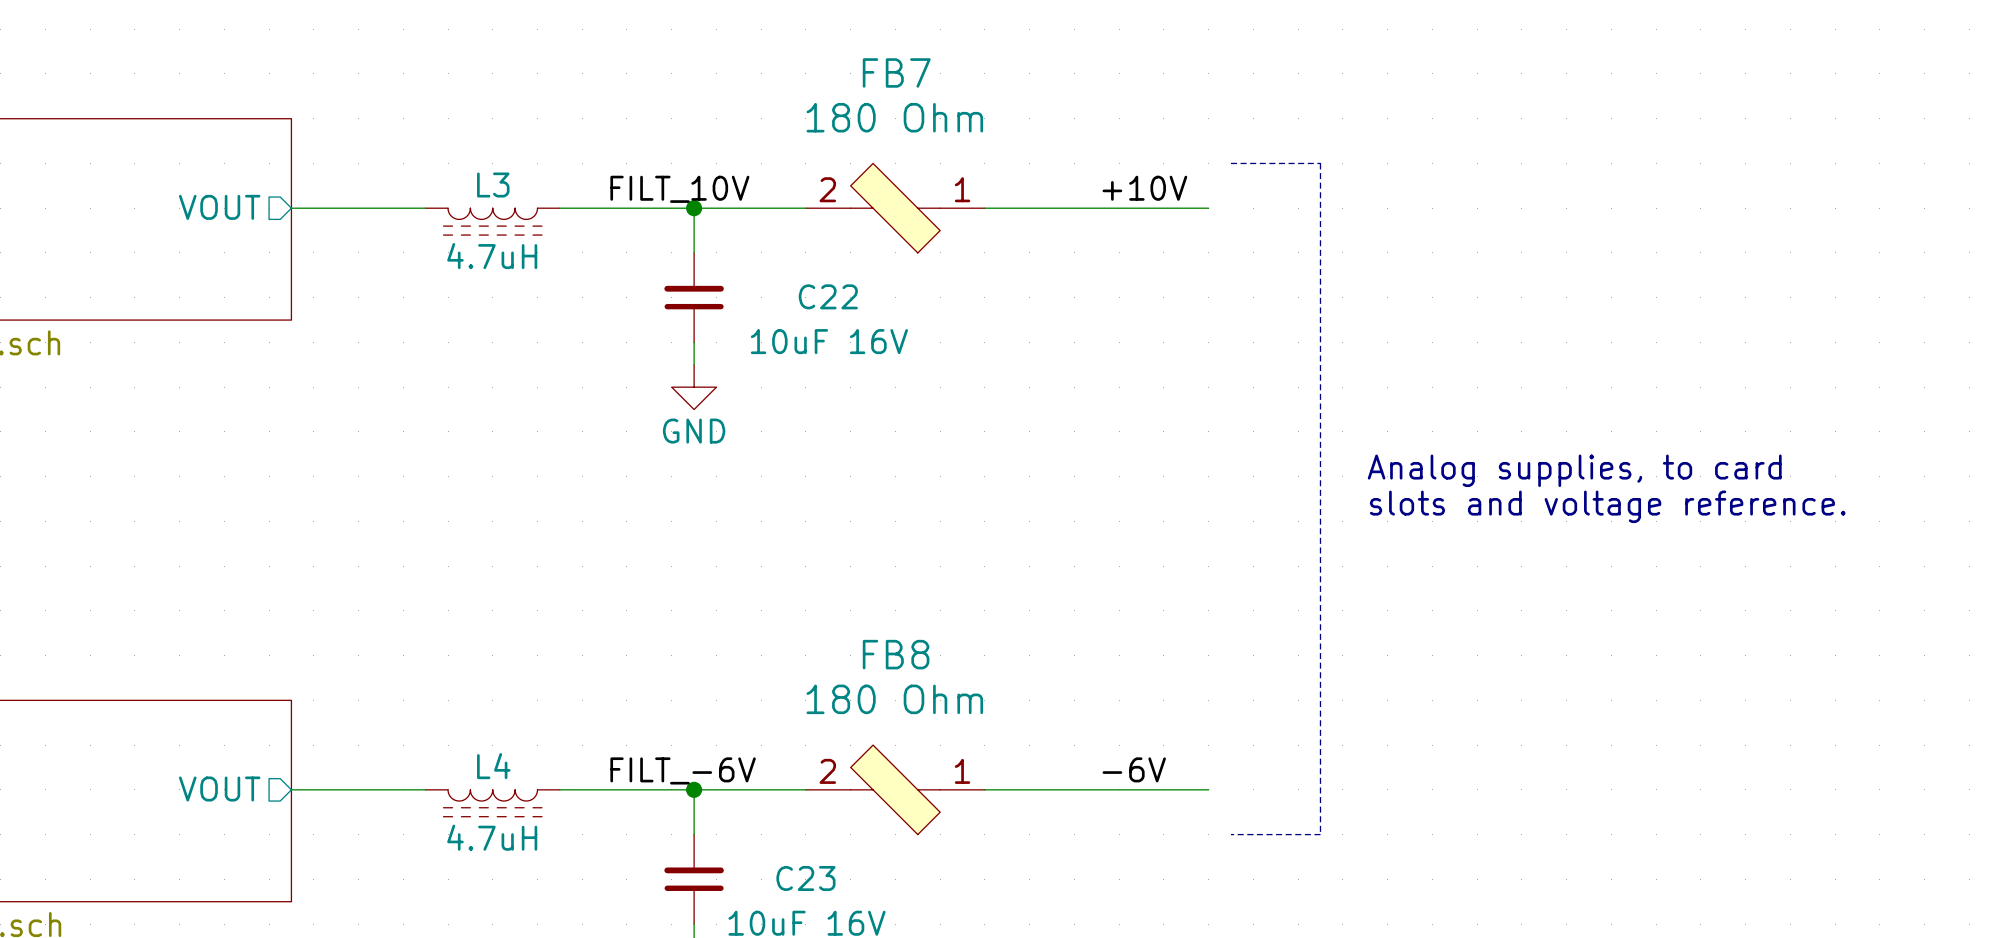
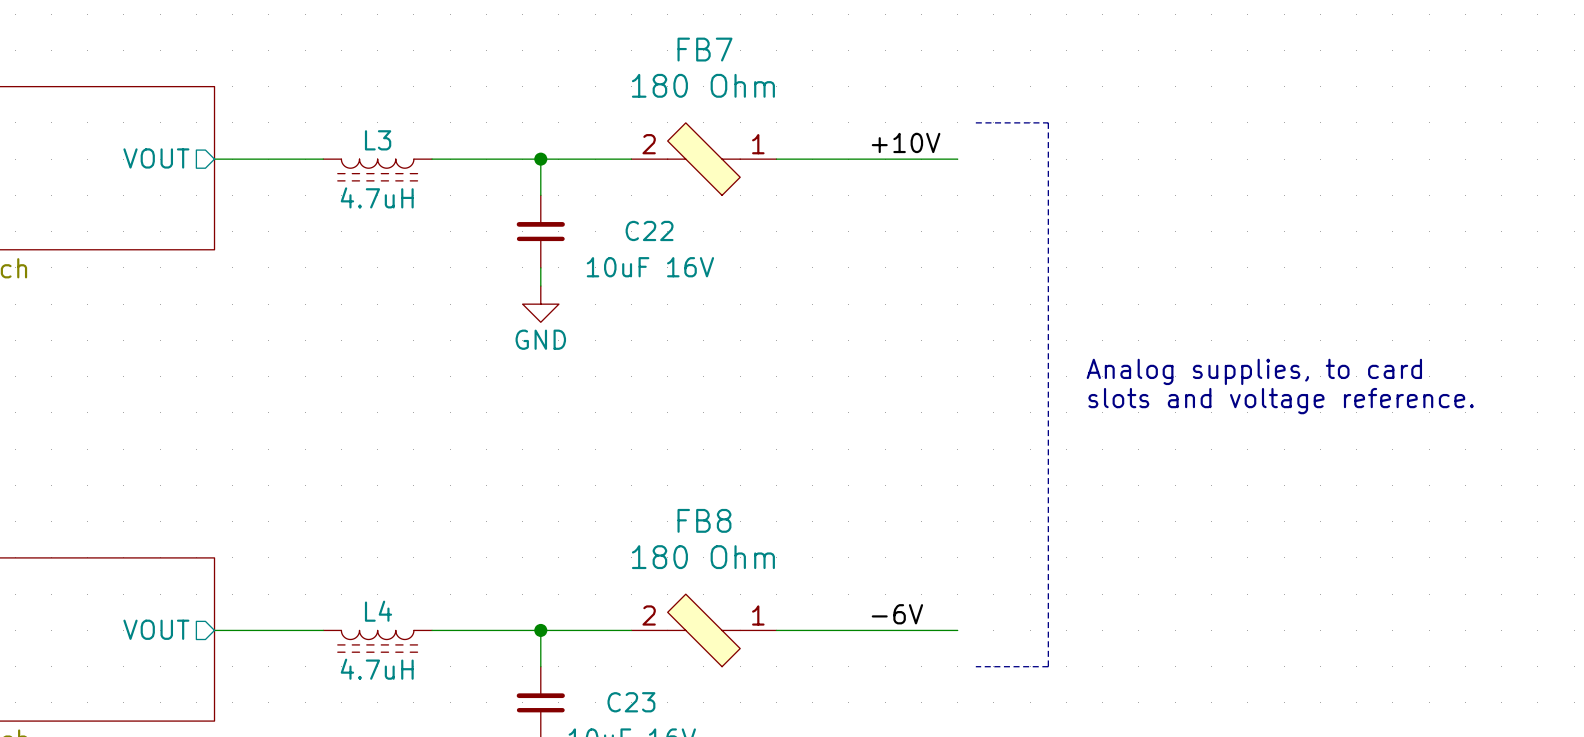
label: FILT_10V (679, 189) -> none
label: FILT_-6V (683, 770) -> none

